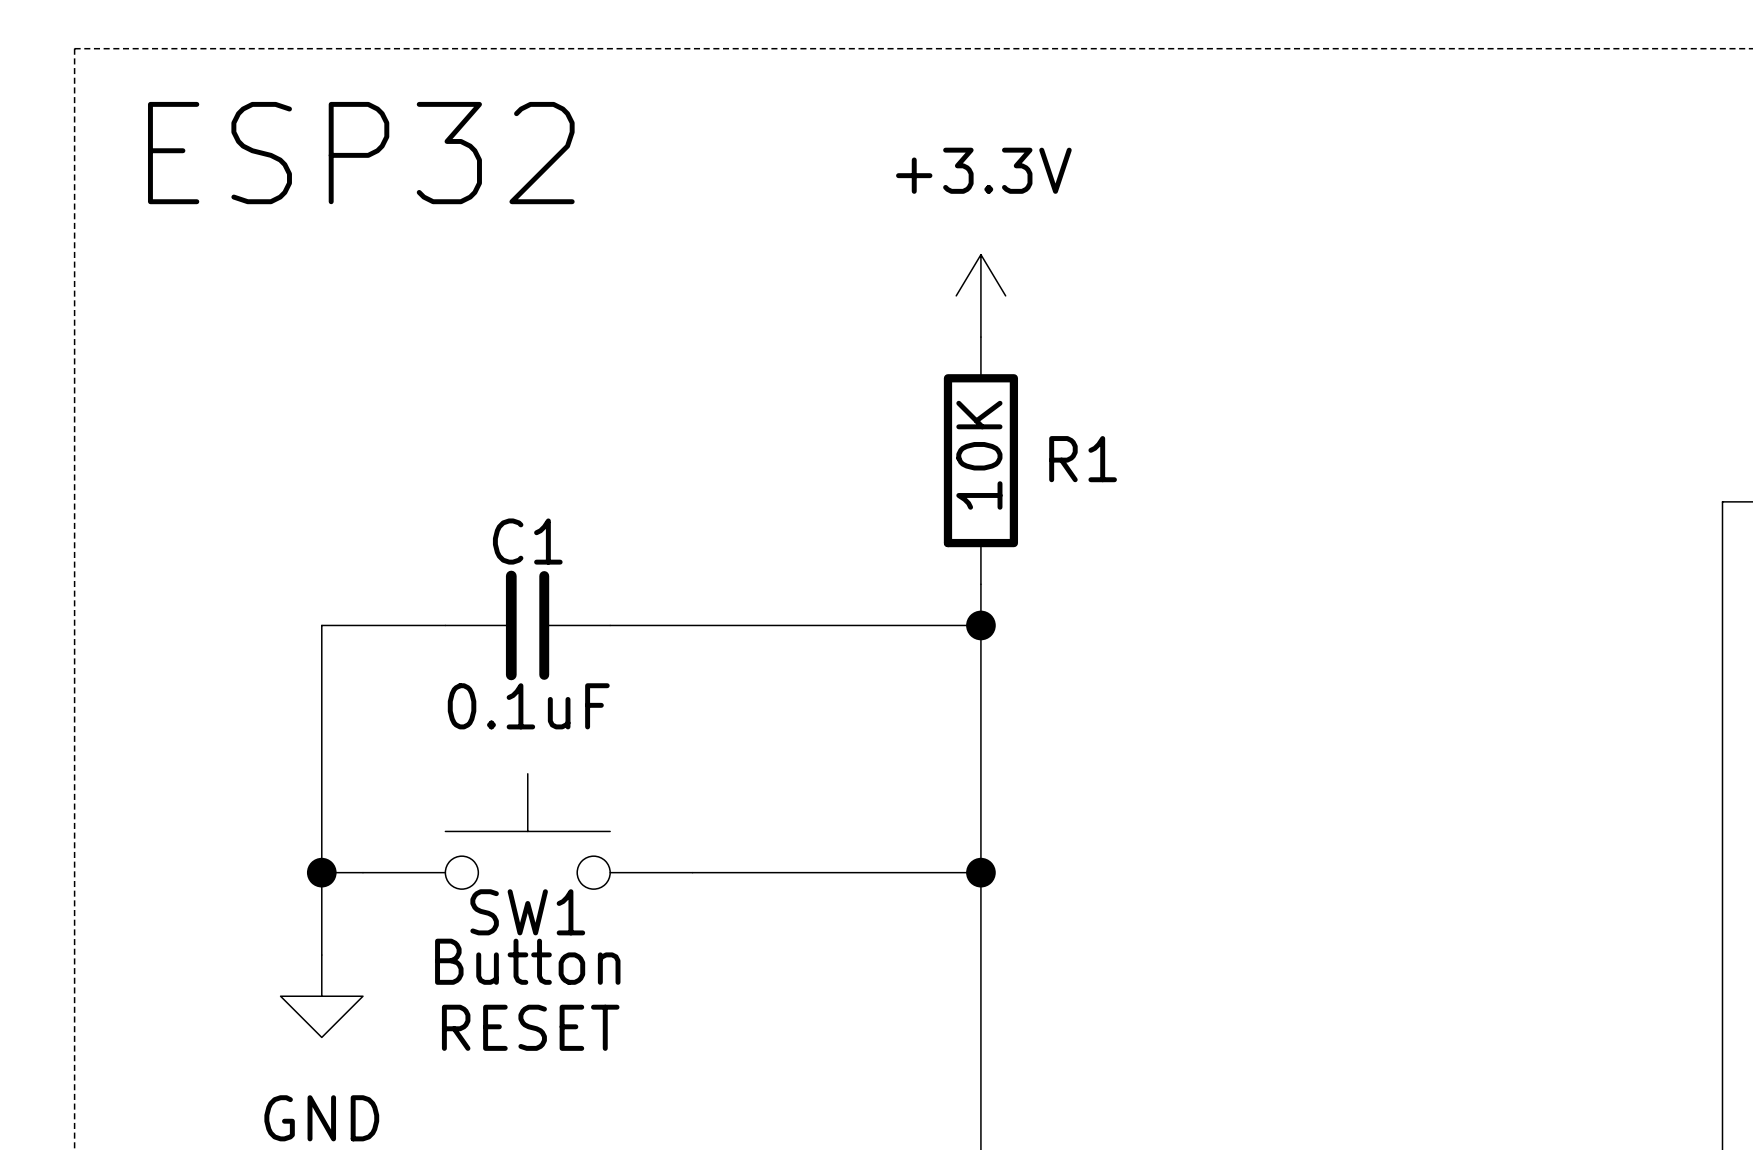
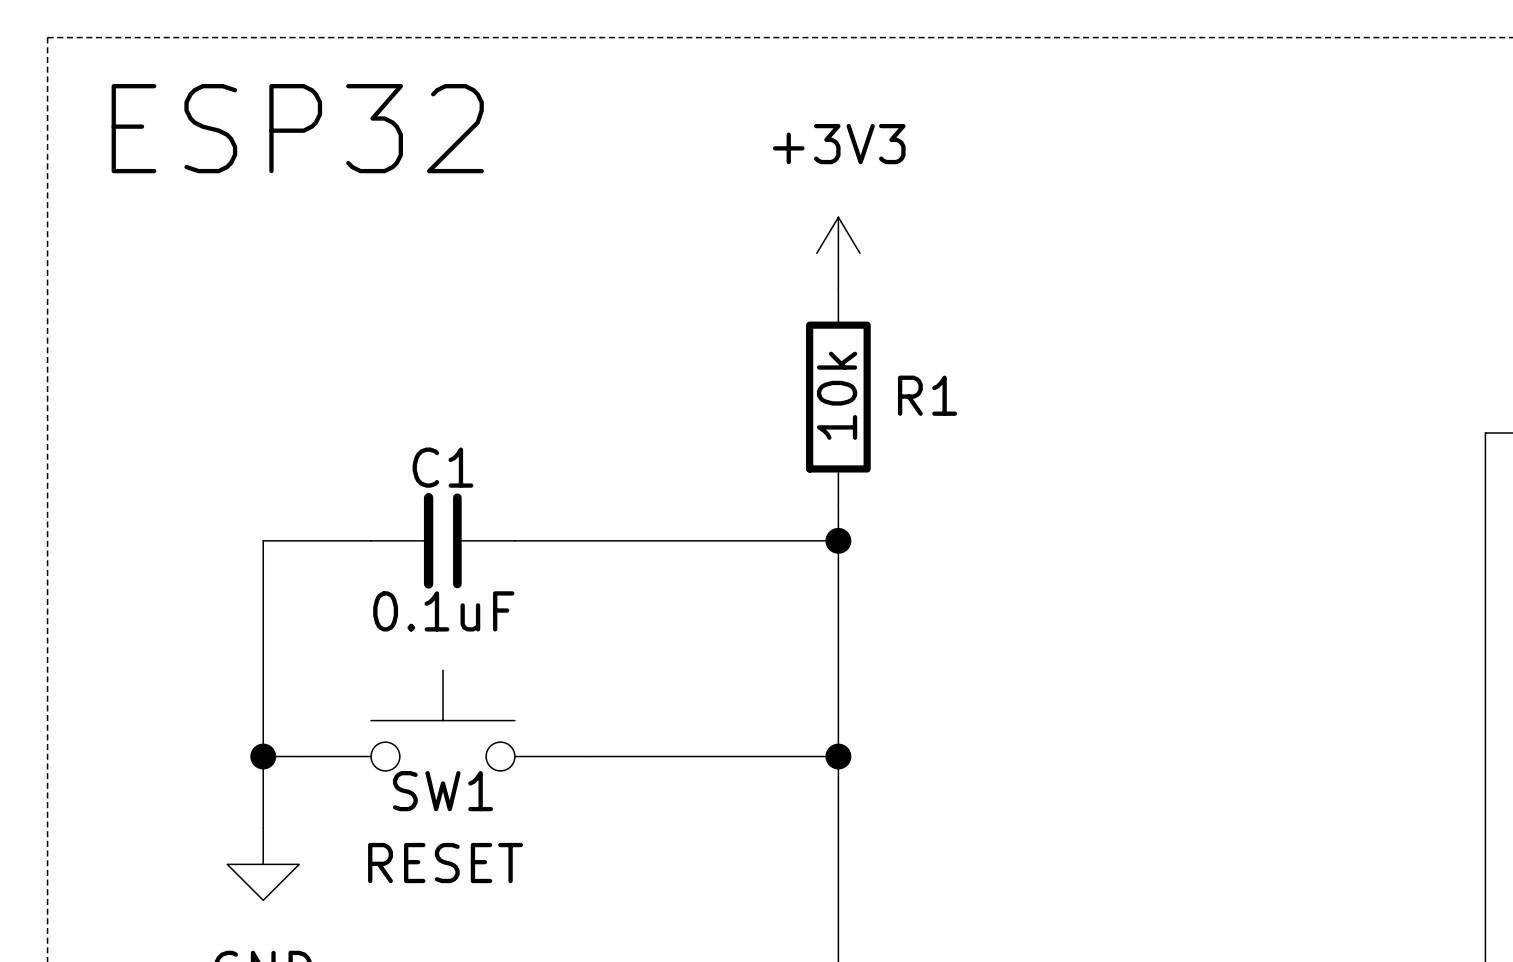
power symbol: +3.3V (980, 295) -> +3V3 (838, 253)
R1 value: 10K (979, 455) -> 10k (837, 395)
SW1 value: Button (527, 961) -> RESET (445, 863)
text: RESET (530, 1027) -> none

